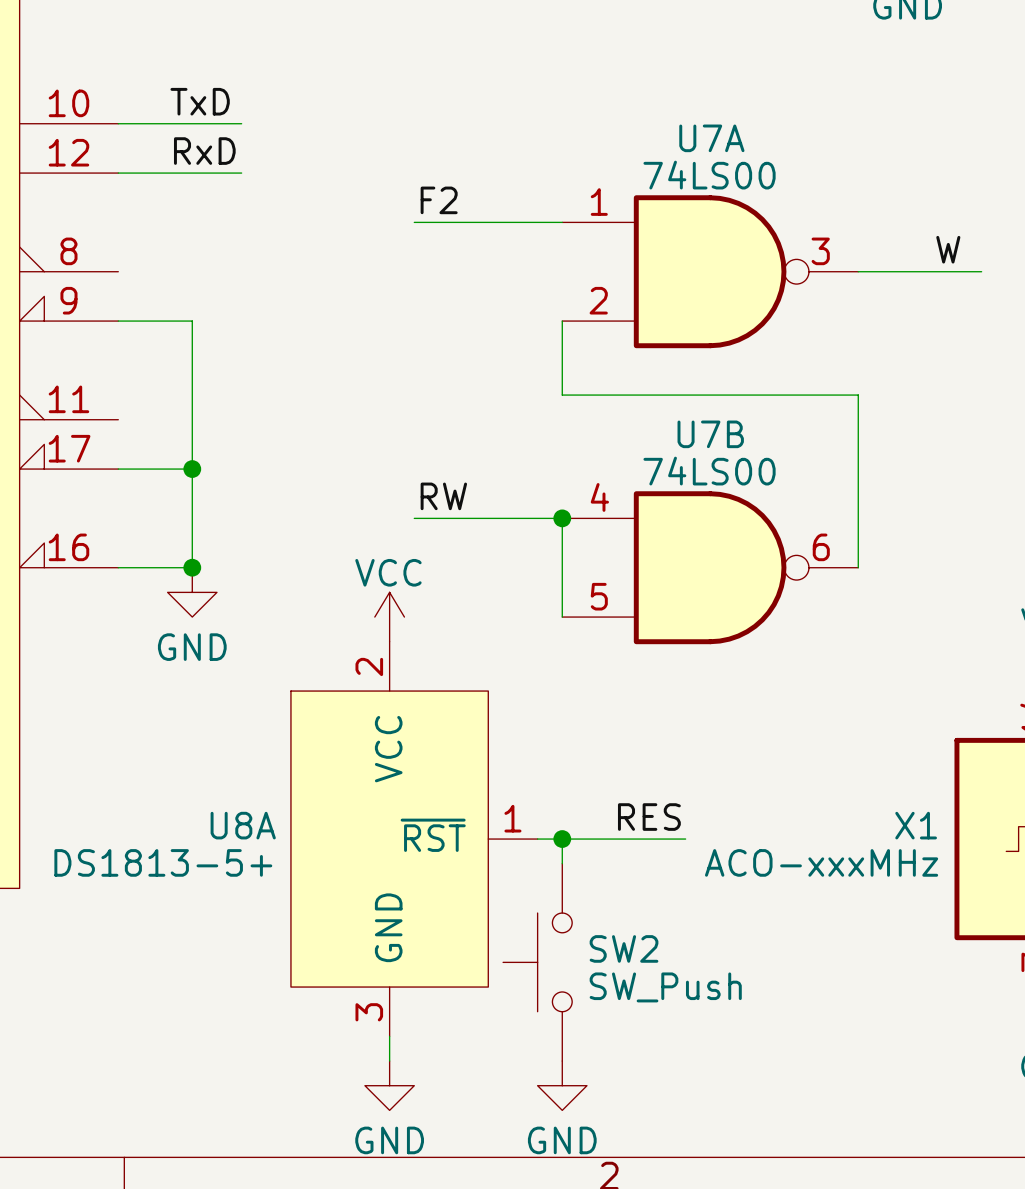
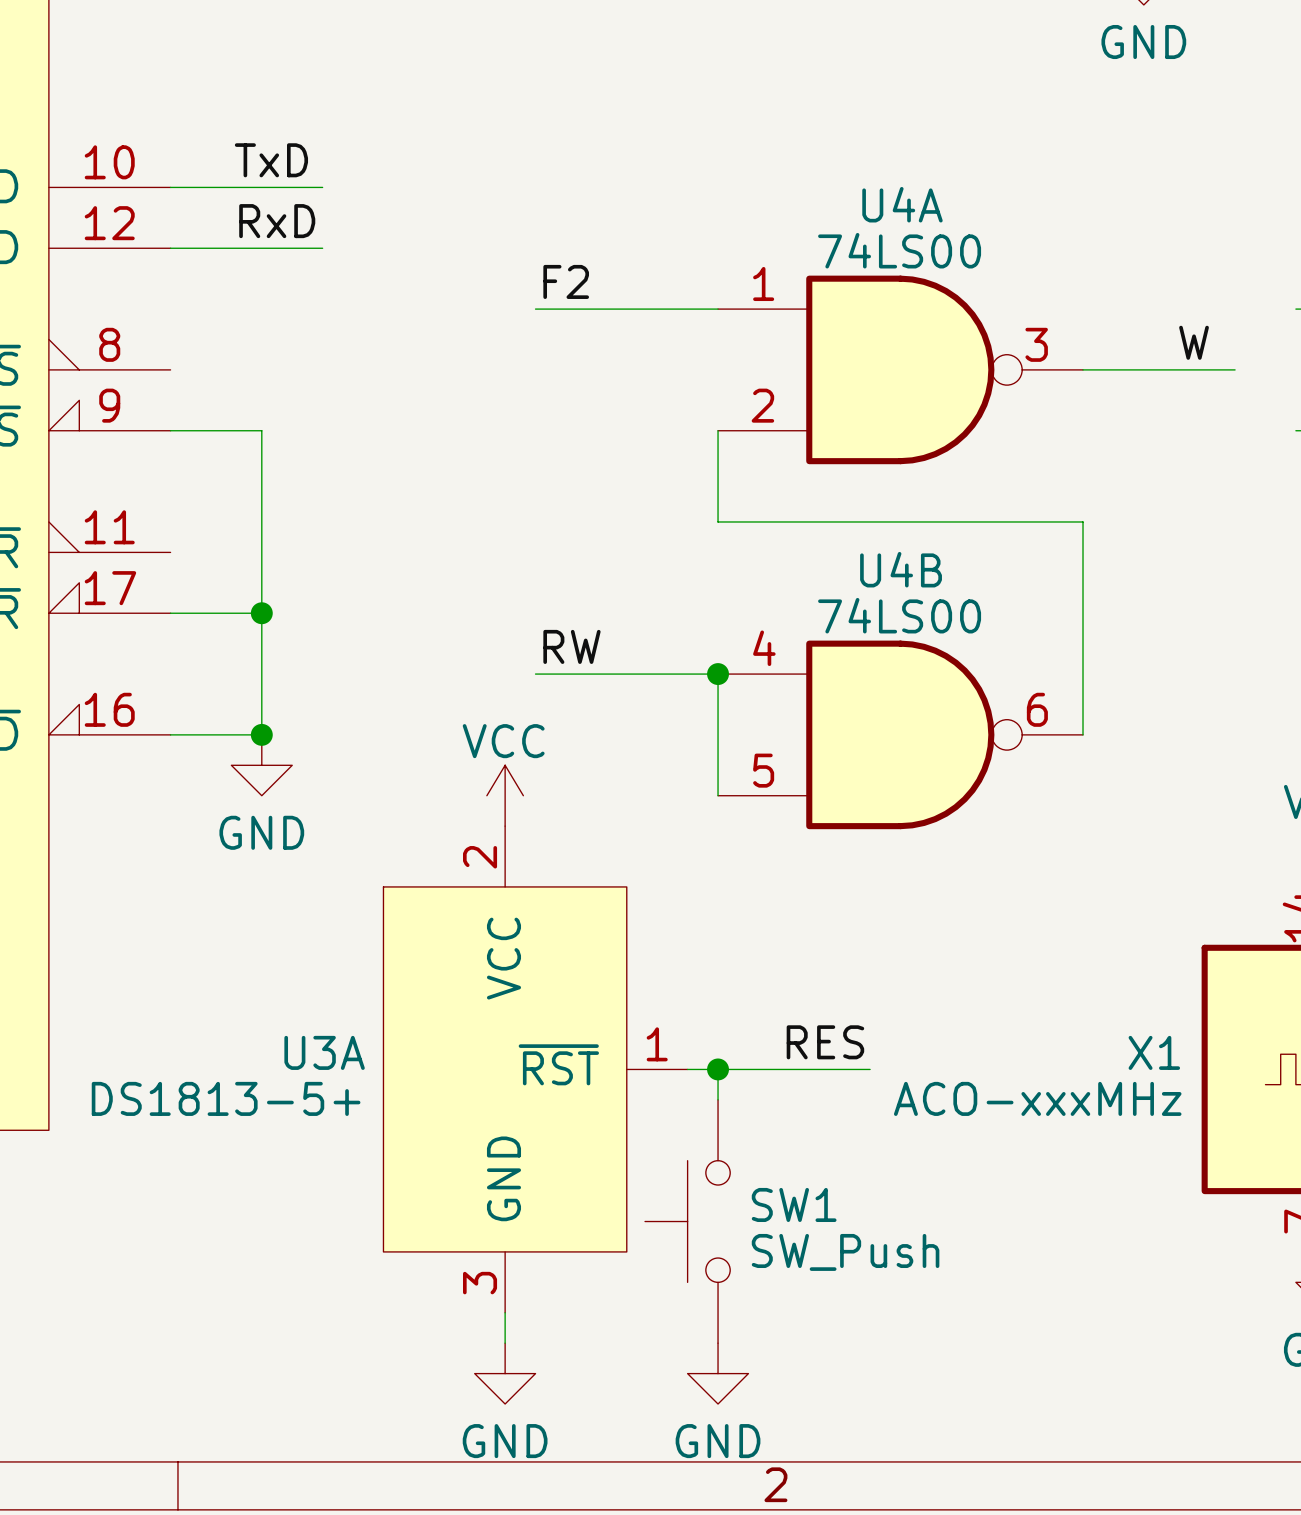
U7A name: U7A (711, 138) -> U4A (902, 204)
U7B name: U7B (710, 434) -> U4B (901, 569)
U8A name: U8A (243, 825) -> U3A (324, 1052)
SW2 name: SW2 (624, 948) -> SW1 (794, 1204)

